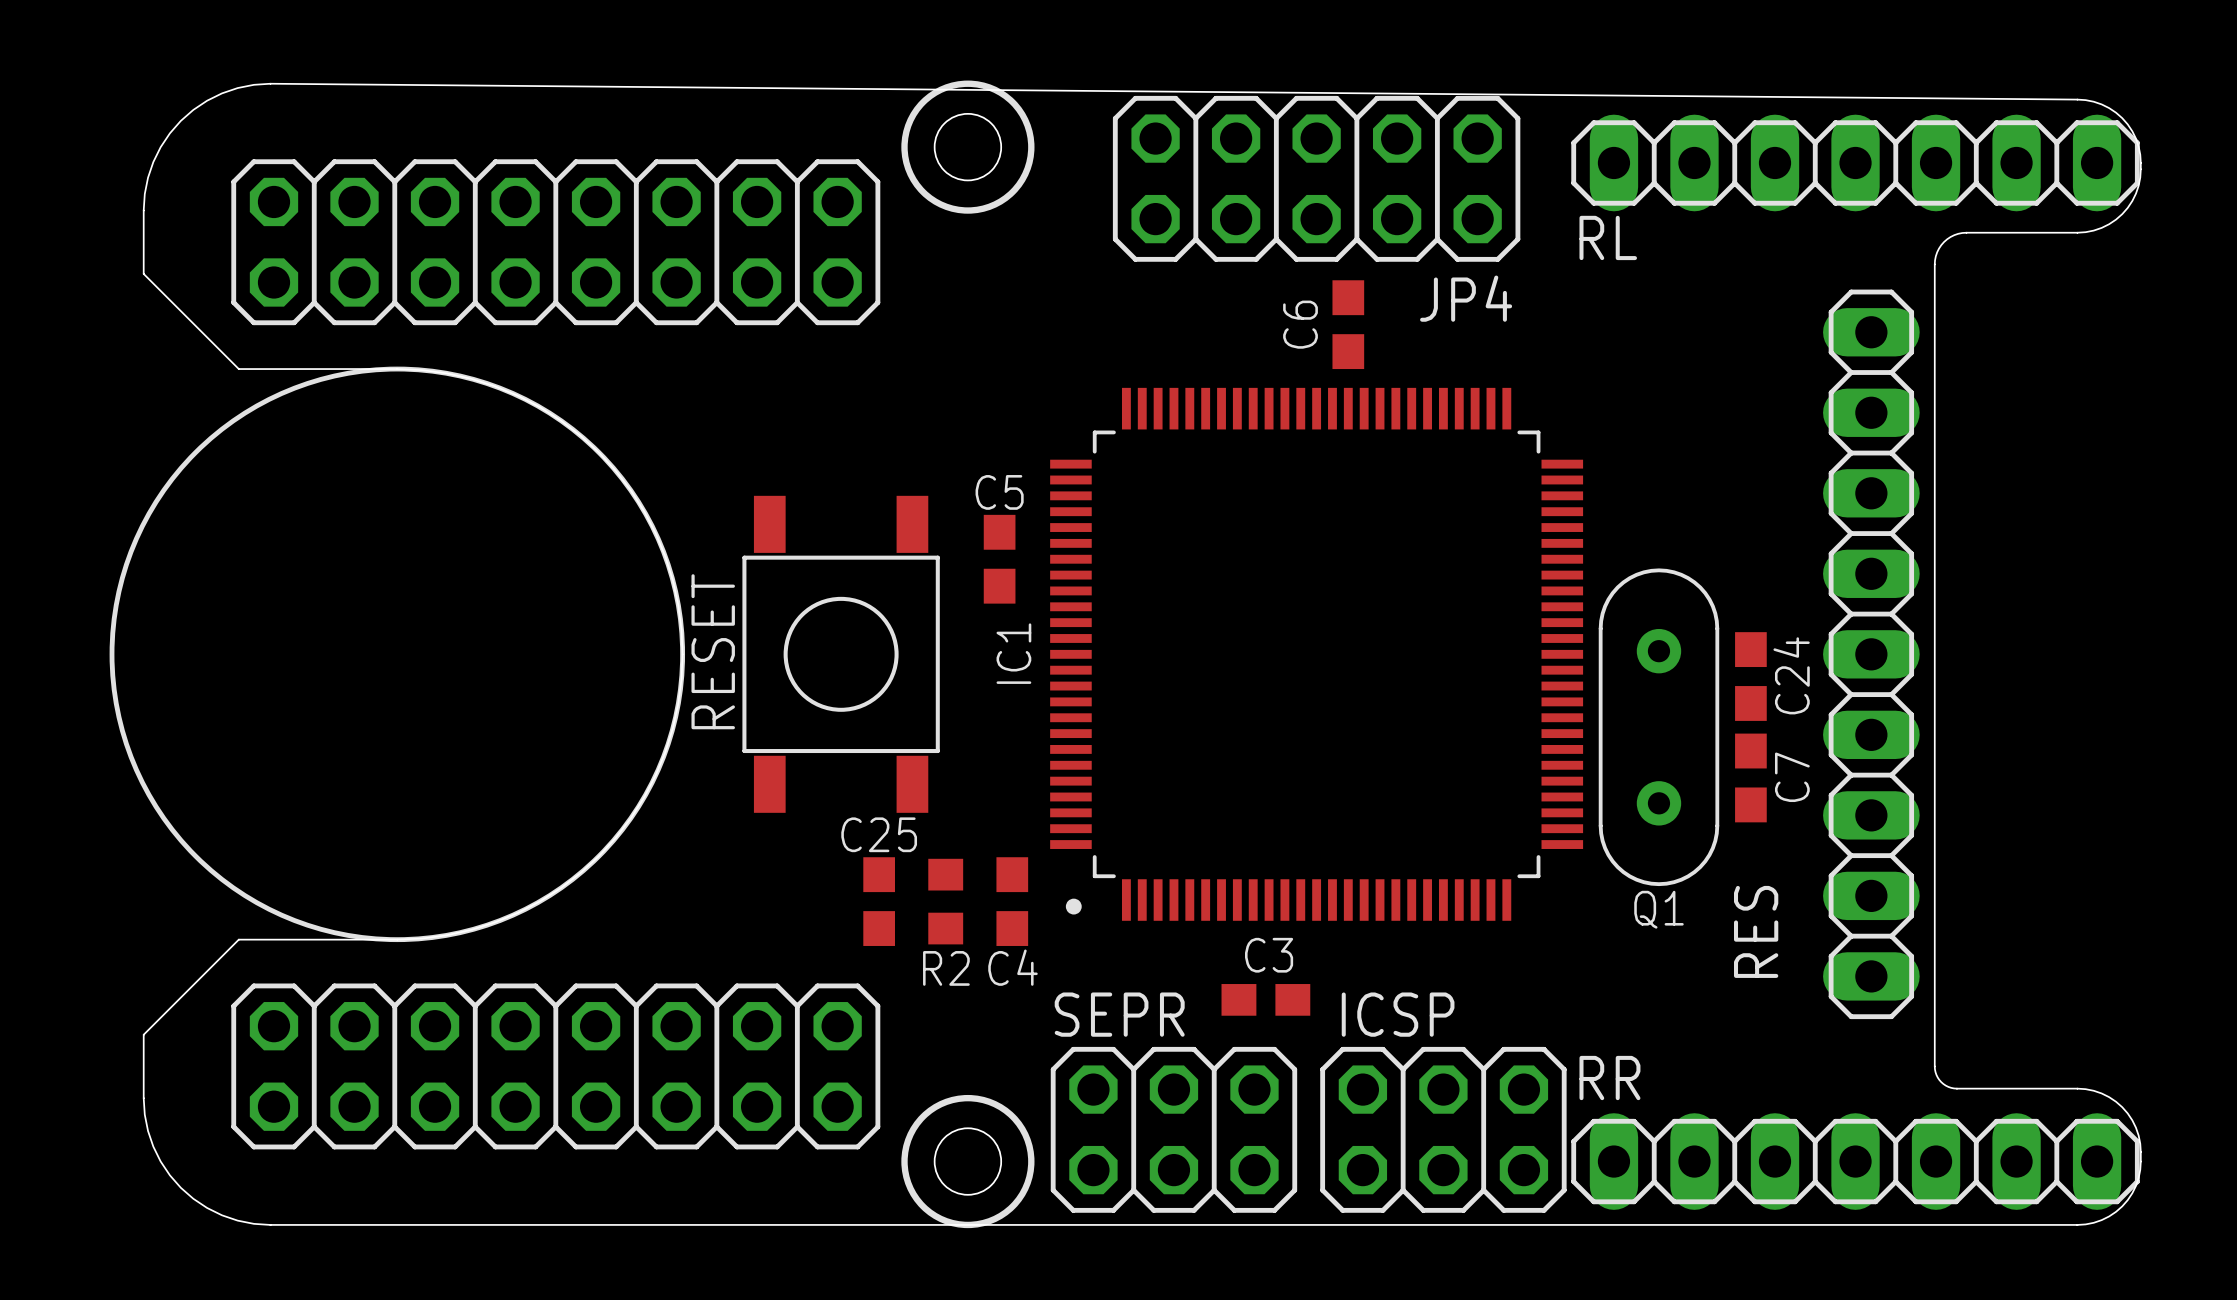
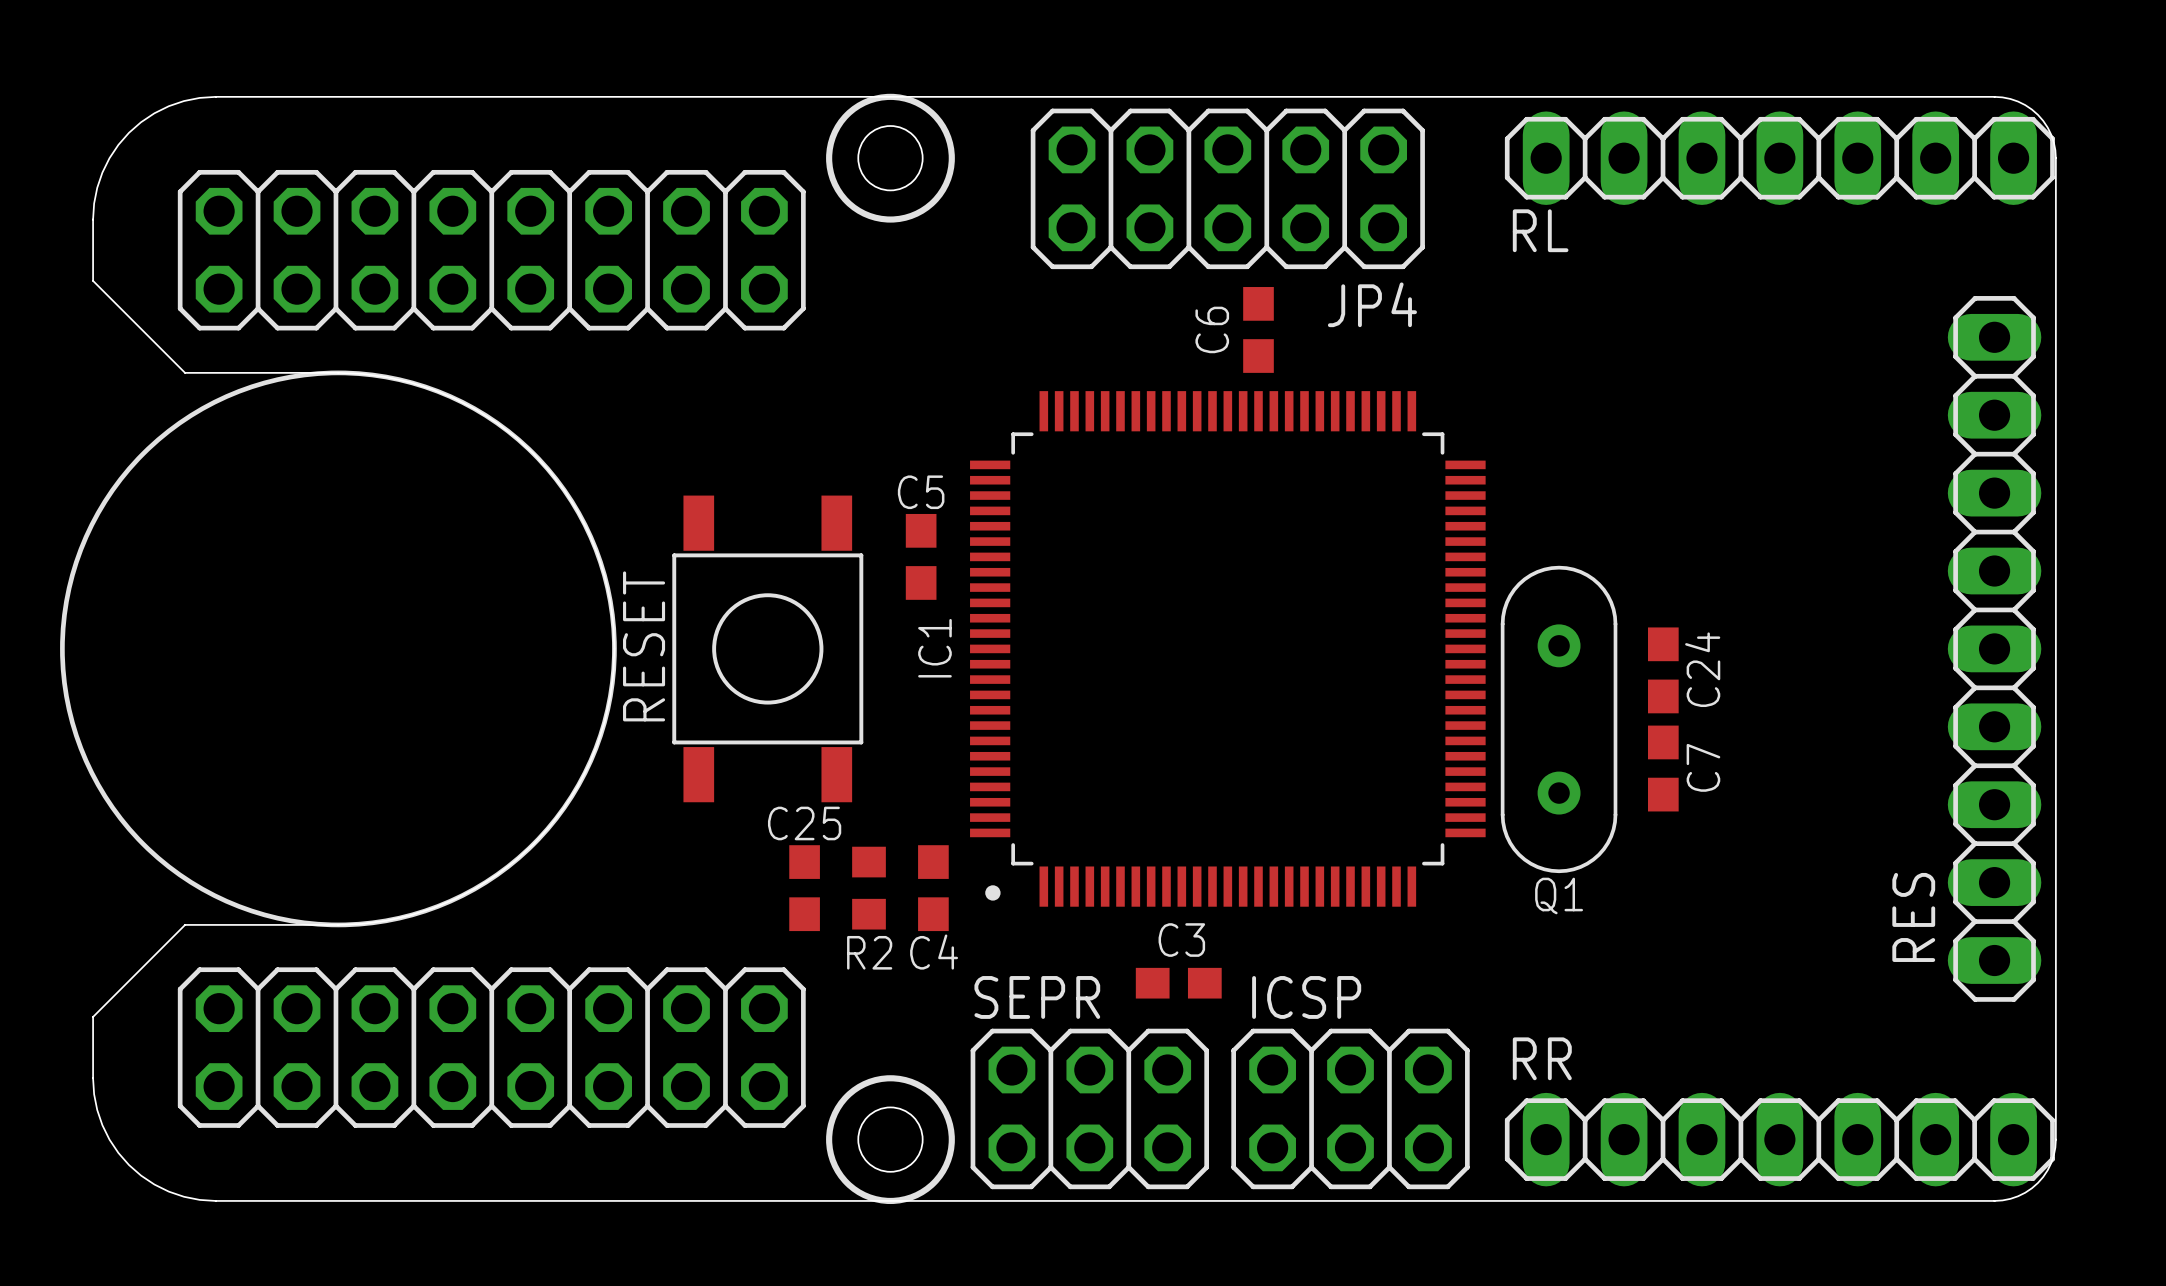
board edge: (270, 83) (2077, 99) (2093, 101) (2109, 108) (2122, 118) (2132, 131) (2140, 154) (2138, 185) (2132, 201) (2122, 214) (2109, 224) (2085, 232) (1958, 233) (1947, 239) (1941, 245) (1937, 252) (1934, 264) (1934, 1069) (1941, 1082) (1951, 1087) (2085, 1089) (2109, 1097) (2122, 1107) (2132, 1120) (2140, 1143) (2140, 1169) (2136, 1185) (2122, 1206) (2109, 1216) (2093, 1222) (2077, 1224) -> (215, 96) (1994, 96) (2010, 98) (2025, 105) (2037, 114) (2047, 127) (2053, 142) (2055, 158) (2055, 1139) (2053, 1155) (2047, 1170) (2037, 1182) (2025, 1192) (2002, 1200) (1963, 1200)
RL position: (1855, 162) -> (1779, 158)
RES position: (1871, 654) -> (1994, 648)
C24 position: (1750, 676) -> (1663, 670)
C7 position: (1750, 777) -> (1663, 768)
RES name position: RES (1756, 931) -> RES (1913, 917)
RR position: (1855, 1161) -> (1779, 1139)

